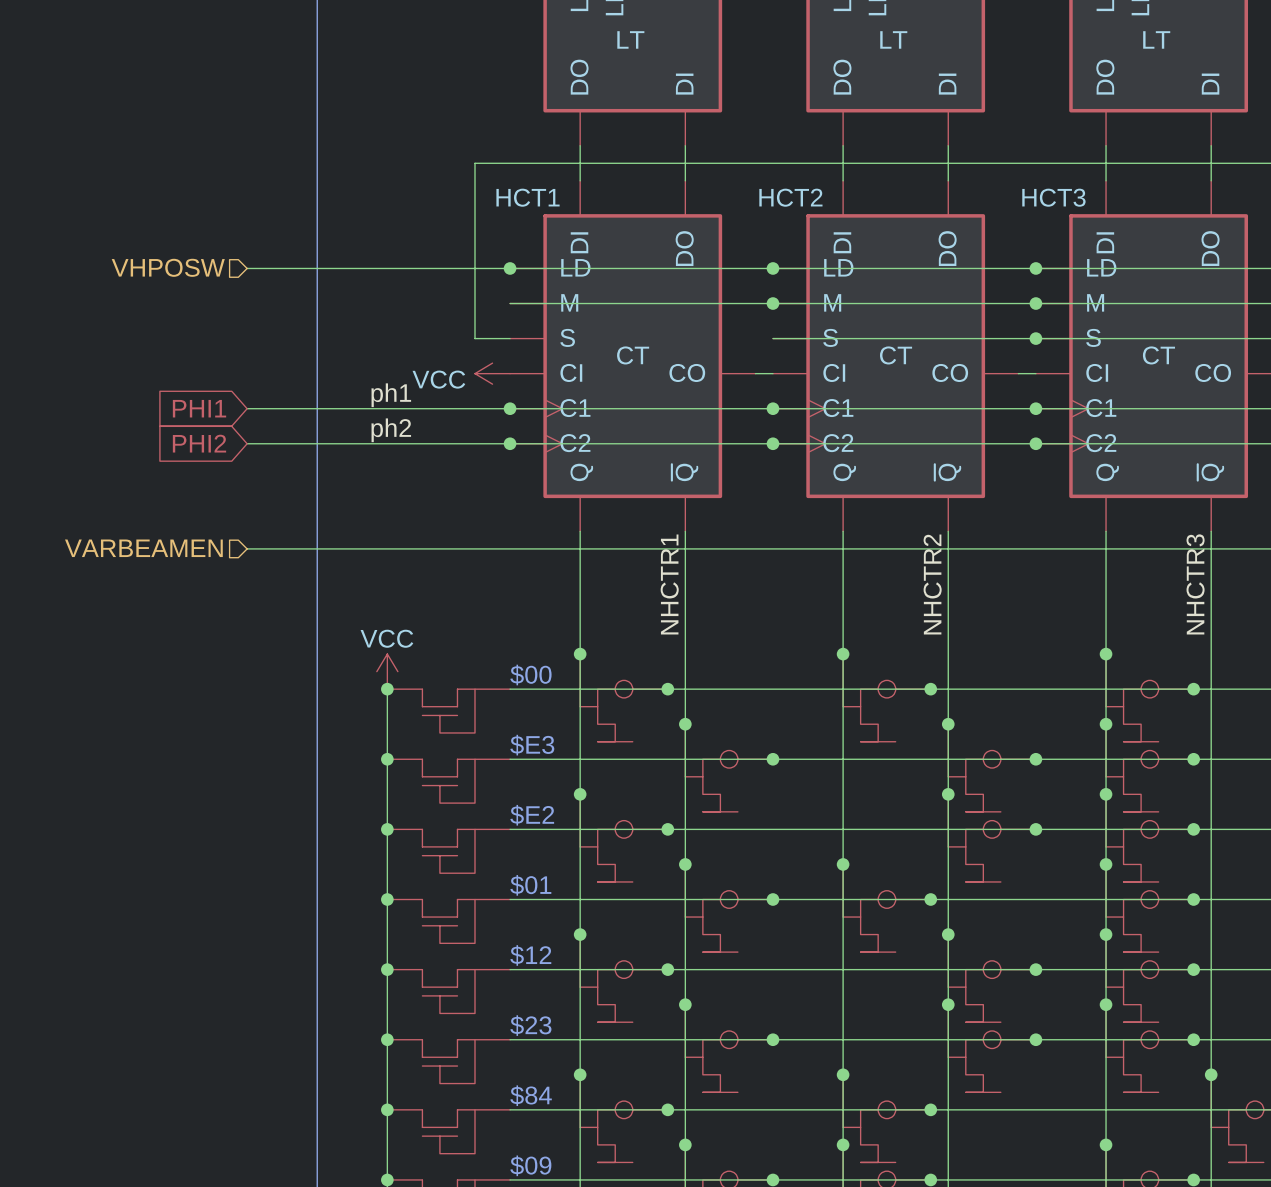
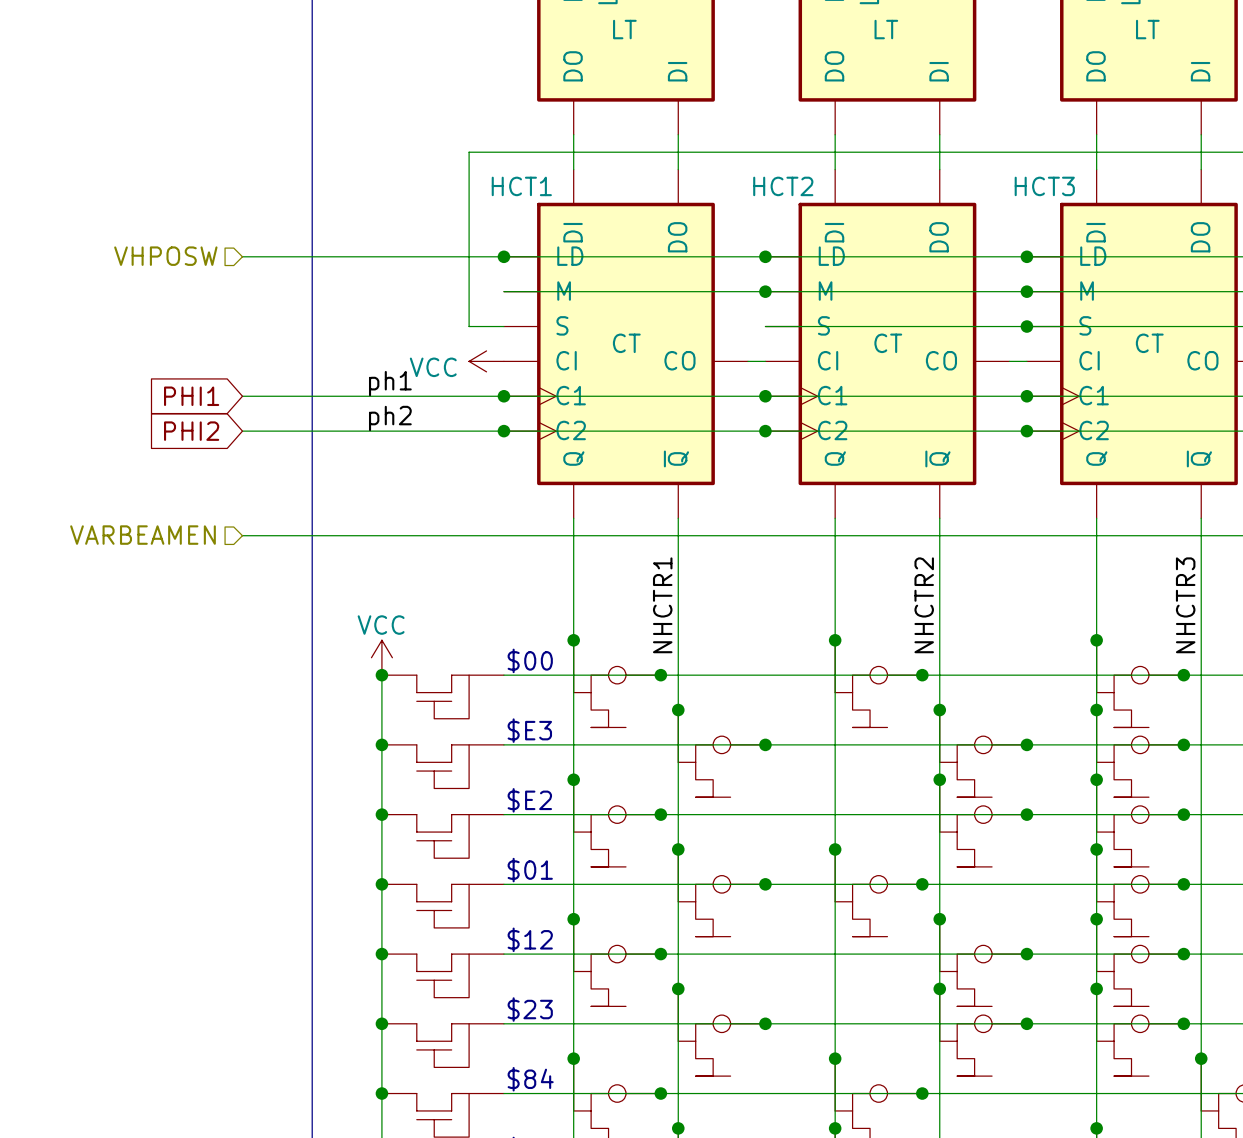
label position: NHCTR1 (669, 584) -> NHCTR1 (662, 605)
label position: NHCTR2 (932, 584) -> NHCTR2 (924, 605)
label position: NHCTR3 (1195, 584) -> NHCTR3 (1185, 605)

